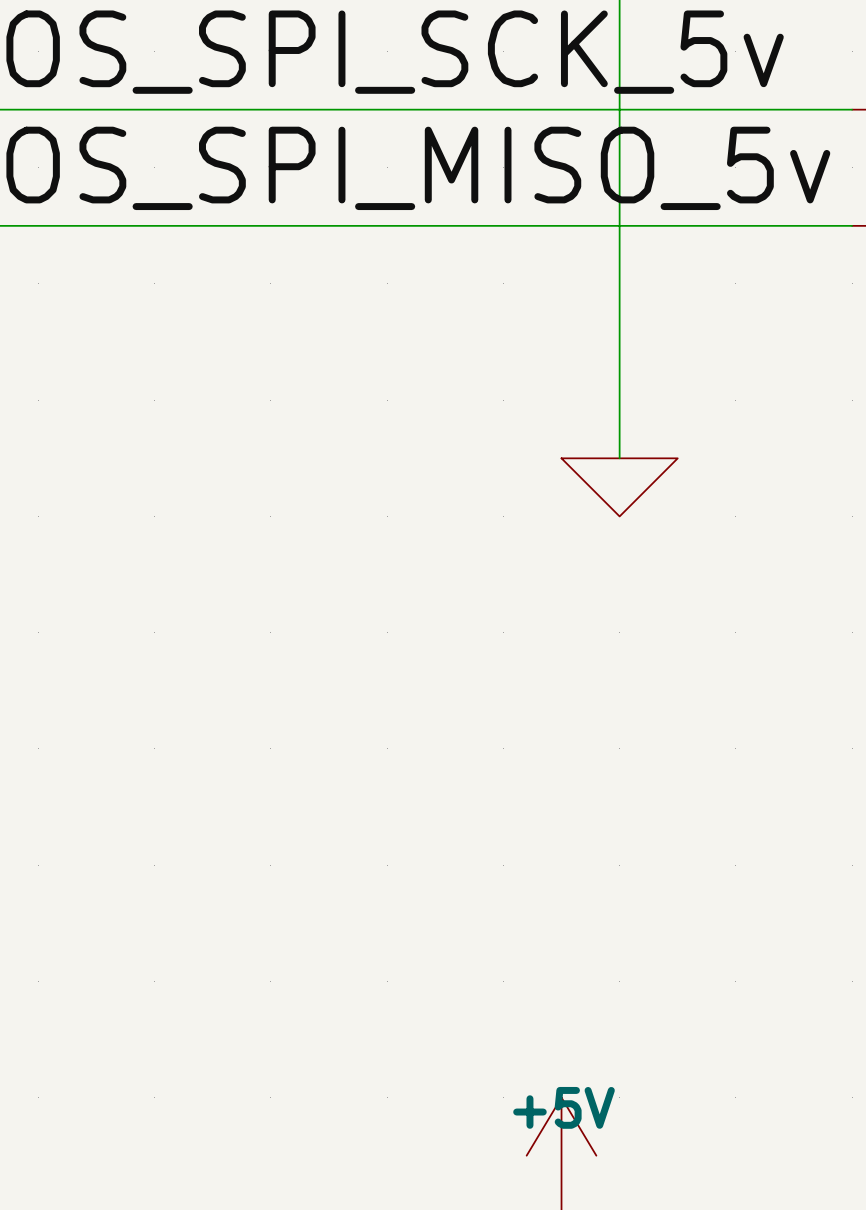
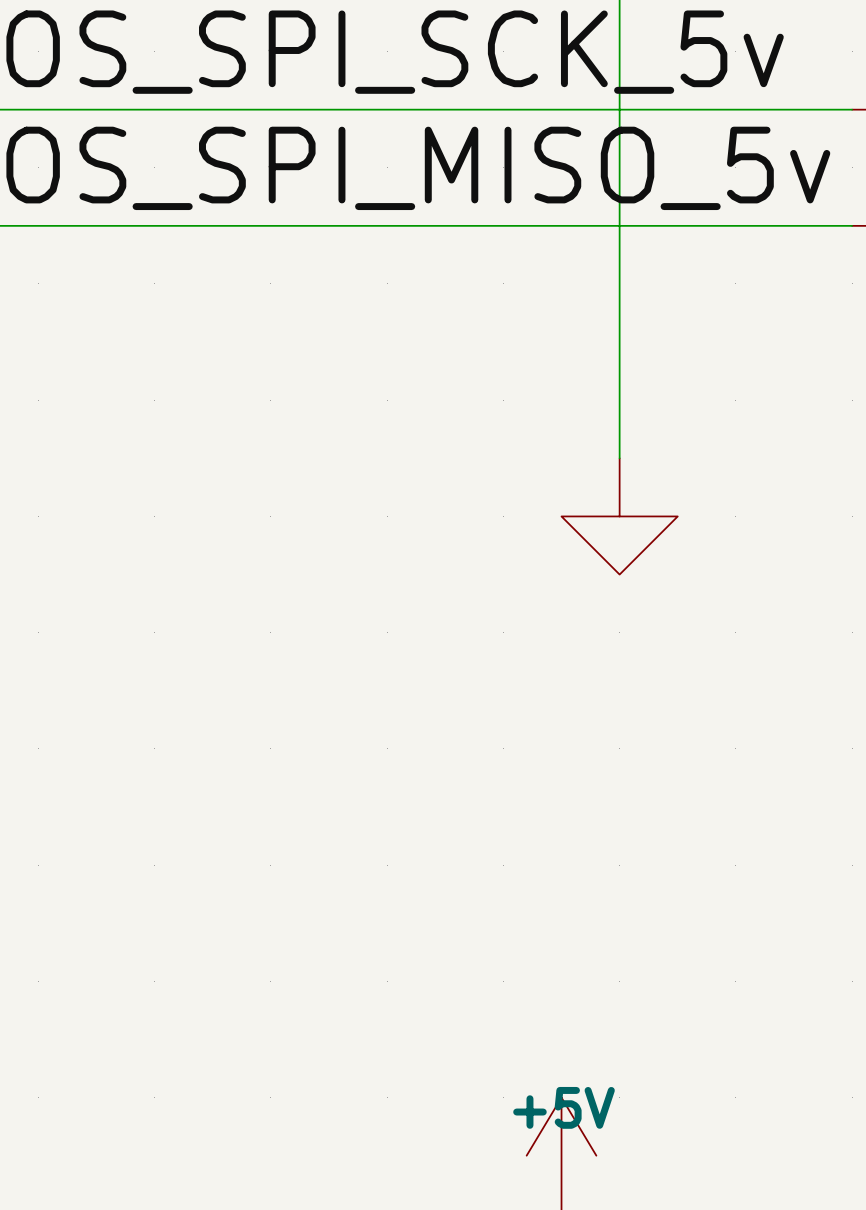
power symbol shape: [561, 458, 678, 517] -> [561, 458, 678, 575]

